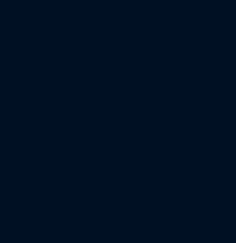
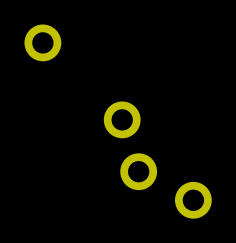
part: none -> (42, 42)
part: none -> (122, 119)
part: none -> (138, 171)
part: none -> (193, 200)

